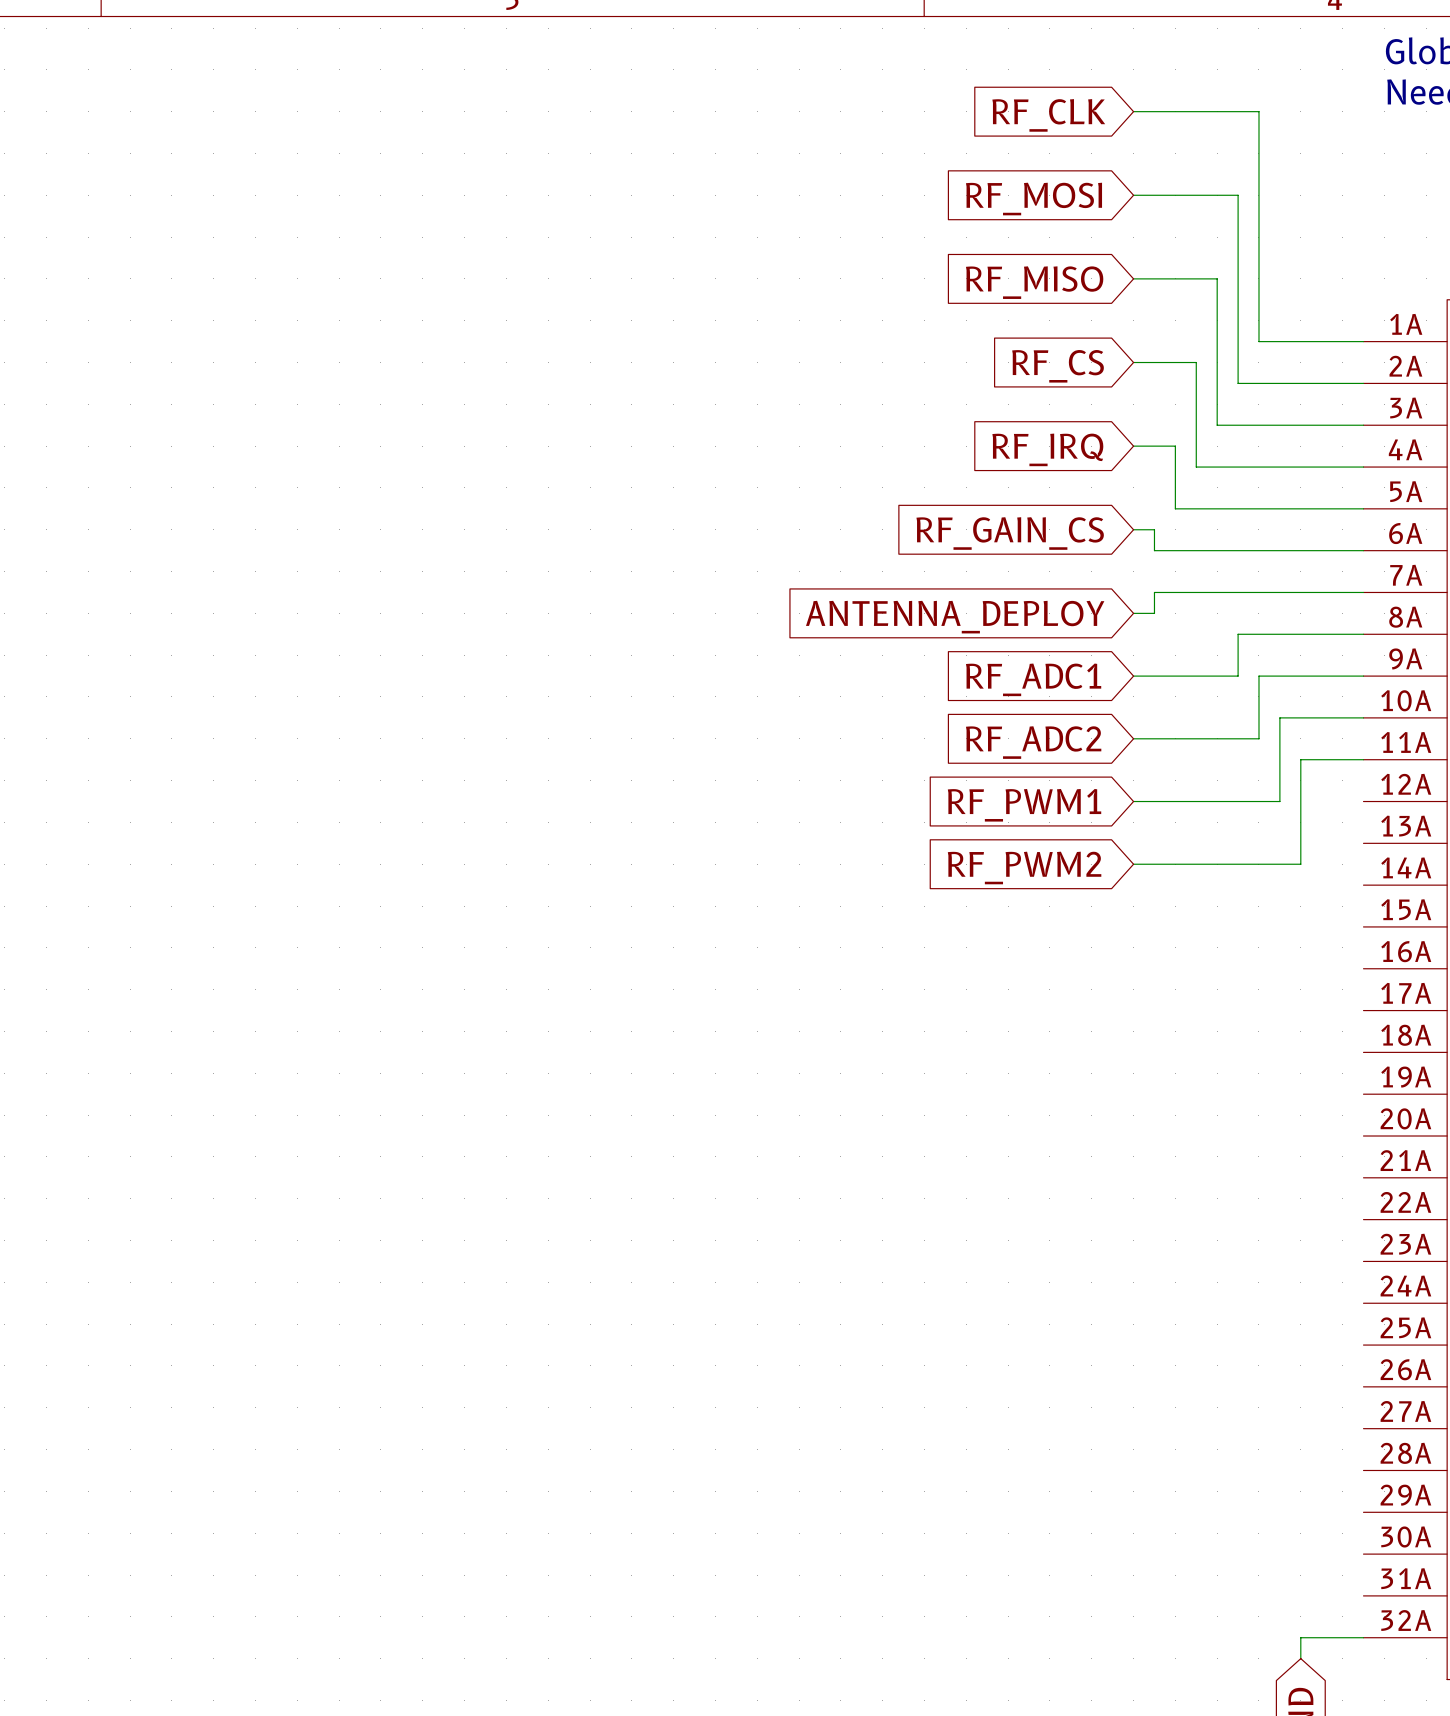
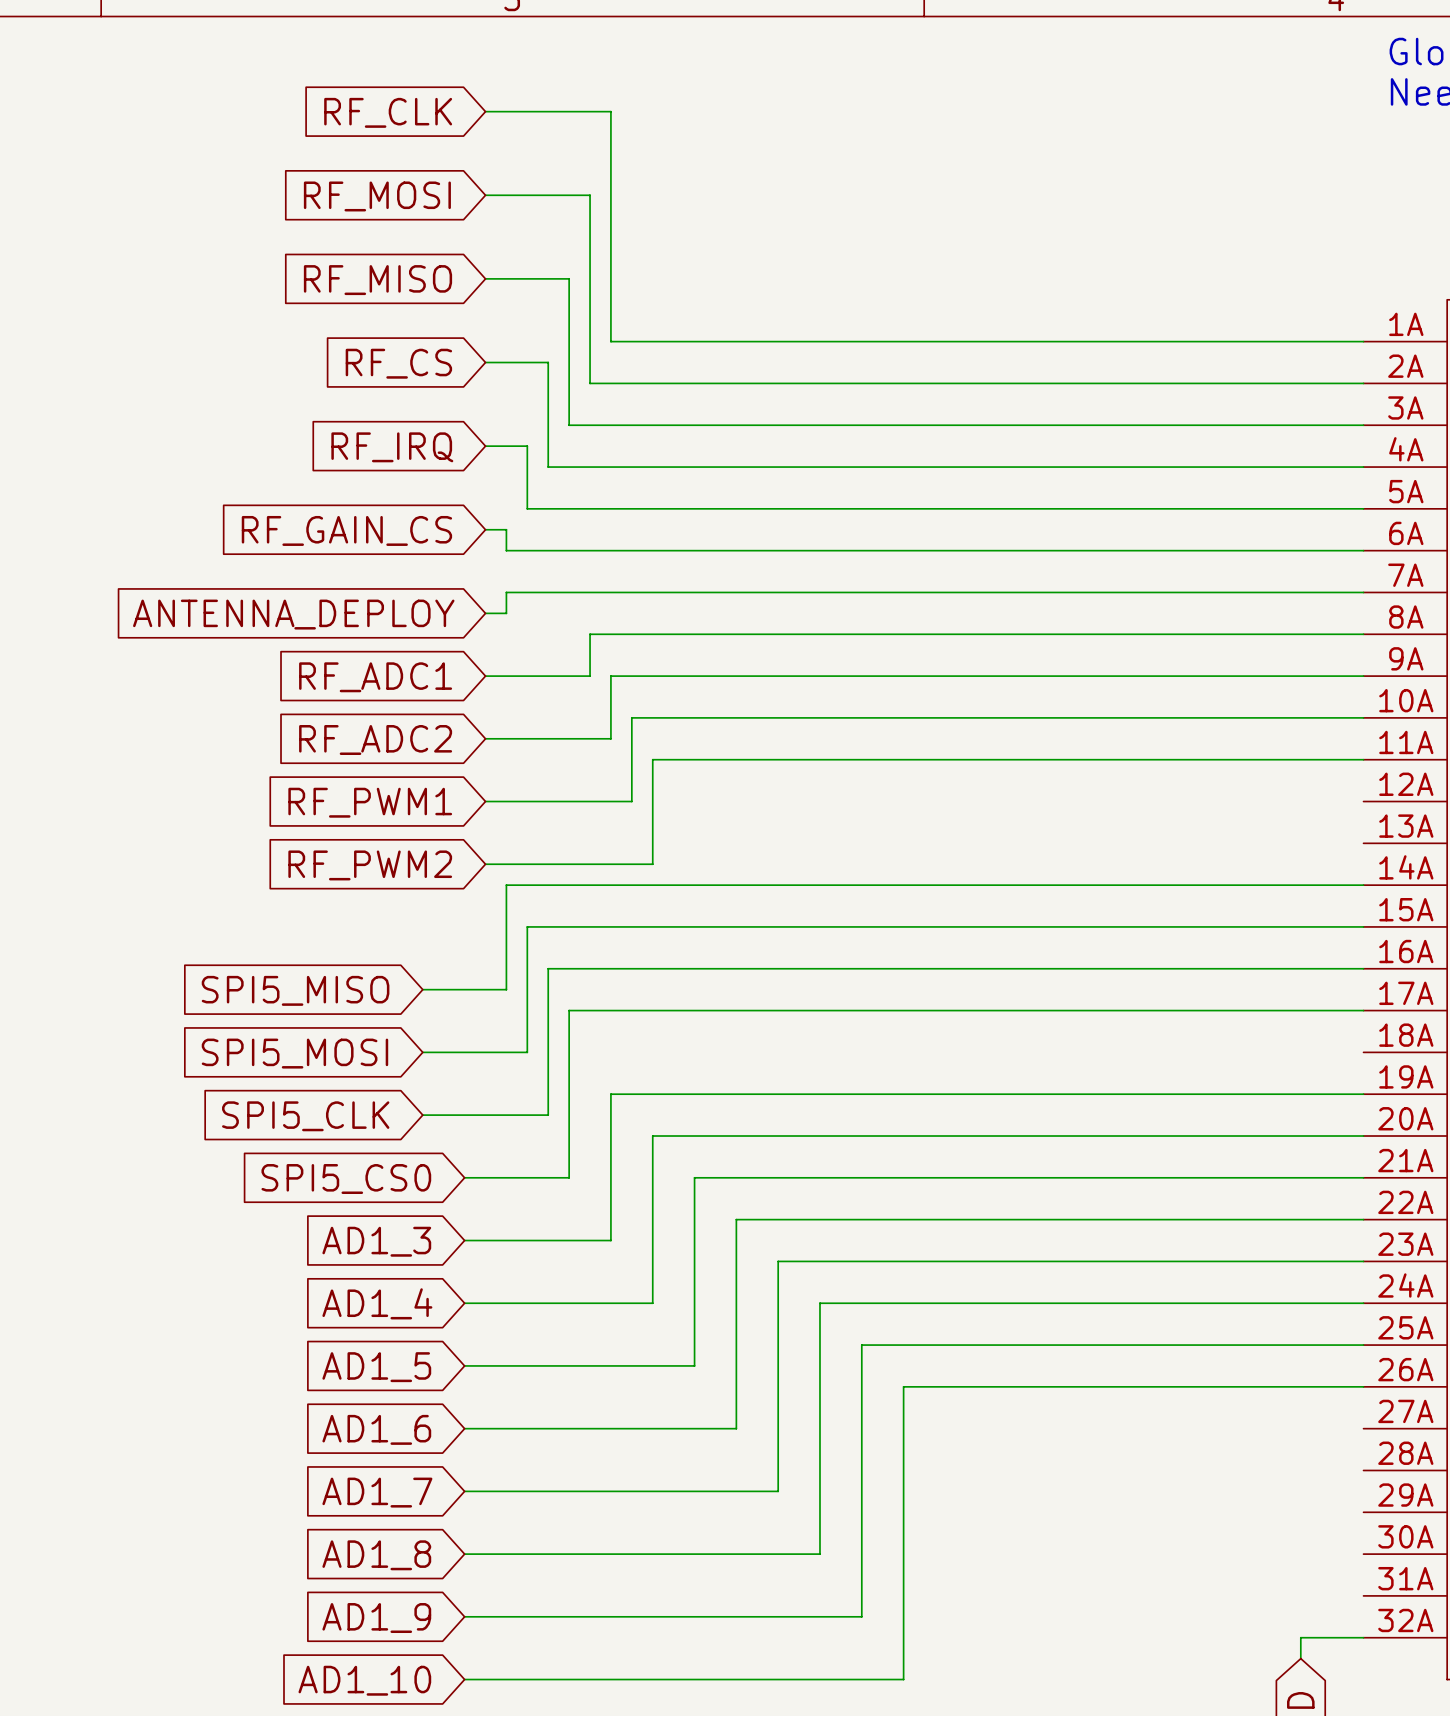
wire: (1133, 111) (1258, 111) (1258, 341) -> (485, 111) (610, 111) (610, 341) (1258, 341)
global label: none -> RF_CLK (388, 112)
global label: RF_CLK (1048, 115) -> none
wire: (1133, 195) (1238, 195) (1238, 383) -> (485, 195) (590, 195) (590, 383) (1238, 383)
global label: none -> RF_MOSI (377, 196)
global label: RF_MOSI (1034, 199) -> none
wire: (1133, 278) (1217, 278) (1217, 425) -> (485, 278) (569, 278) (569, 425) (1217, 425)
global label: none -> RF_MISO (377, 280)
global label: RF_MISO (1034, 282) -> none
wire: (1133, 362) (1196, 362) (1196, 467) -> (485, 362) (548, 362) (548, 467) (1196, 467)
global label: none -> RF_CS (398, 363)
global label: RF_CS (1058, 366) -> none
wire: (1133, 446) (1175, 446) (1175, 508) -> (485, 446) (527, 446) (527, 508) (1175, 508)
global label: none -> RF_IRQ (392, 447)
global label: RF_IRQ (1047, 449) -> none
wire: (1133, 529) (1154, 529) (1154, 550) -> (485, 529) (506, 529) (506, 550) (1154, 550)
global label: none -> RF_GAIN_CS (346, 530)
global label: RF_GAIN_CS (1010, 533) -> none
wire: (1154, 592) (1154, 613) (1133, 613) -> (1154, 592) (506, 592) (506, 613) (485, 613)
global label: none -> ANTENNA_DEPLOY (293, 614)
global label: ANTENNA_DEPLOY (955, 617) -> none
wire: (1238, 634) (1238, 676) -> (1258, 676) (1238, 676)
wire: none -> (1238, 634) (590, 634) (590, 676) (485, 676)
wire: none -> (1133, 676) (610, 676) (610, 738) (485, 738)
wire: (1258, 676) (1258, 738) (1133, 738) -> none
global label: none -> RF_ADC1 (375, 677)
global label: RF_ADC1 (1033, 679) -> none
wire: (1279, 717) (1279, 801) (1133, 801) -> (1279, 717) (631, 717) (631, 801) (485, 801)
global label: none -> RF_ADC2 (375, 740)
global label: RF_ADC2 (1033, 742) -> none
wire: (1300, 759) (1300, 864) (1133, 864) -> (1300, 759) (652, 759) (652, 864) (485, 864)
global label: none -> RF_PWM1 (370, 802)
global label: RF_PWM1 (1024, 805) -> none
global label: none -> RF_PWM2 (370, 865)
global label: RF_PWM2 (1024, 867) -> none
wire: none -> (1363, 885) (506, 885) (506, 989) (422, 989)
wire: none -> (1363, 926) (527, 926) (527, 1052) (422, 1052)
wire: none -> (1363, 968) (548, 968) (548, 1115) (422, 1115)
global label: none -> SPI5_MISO (295, 990)
wire: none -> (1363, 1010) (569, 1010) (569, 1177) (464, 1177)
global label: none -> SPI5_MOSI (294, 1053)
wire: none -> (1363, 1094) (610, 1094) (610, 1240) (464, 1240)
global label: none -> SPI5_CLK (305, 1116)
wire: none -> (1363, 1136) (652, 1136) (652, 1303) (464, 1303)
wire: none -> (1363, 1177) (694, 1177) (694, 1365) (464, 1365)
global label: none -> SPI5_CS0 (346, 1179)
wire: none -> (1363, 1219) (736, 1219) (736, 1428) (464, 1428)
global label: none -> AD1_3 (376, 1241)
wire: none -> (1363, 1261) (778, 1261) (778, 1491) (464, 1491)
wire: none -> (1363, 1303) (819, 1303) (819, 1554) (464, 1554)
global label: none -> AD1_4 (377, 1303)
wire: none -> (1363, 1345) (861, 1345) (861, 1616) (464, 1616)
global label: none -> AD1_5 (376, 1367)
wire: none -> (1363, 1386) (903, 1386) (903, 1679) (464, 1679)
global label: none -> AD1_6 (376, 1429)
global label: none -> AD1_7 (377, 1492)
global label: none -> AD1_8 (376, 1555)
global label: none -> AD1_9 (376, 1618)
global label: none -> AD1_10 (364, 1680)

